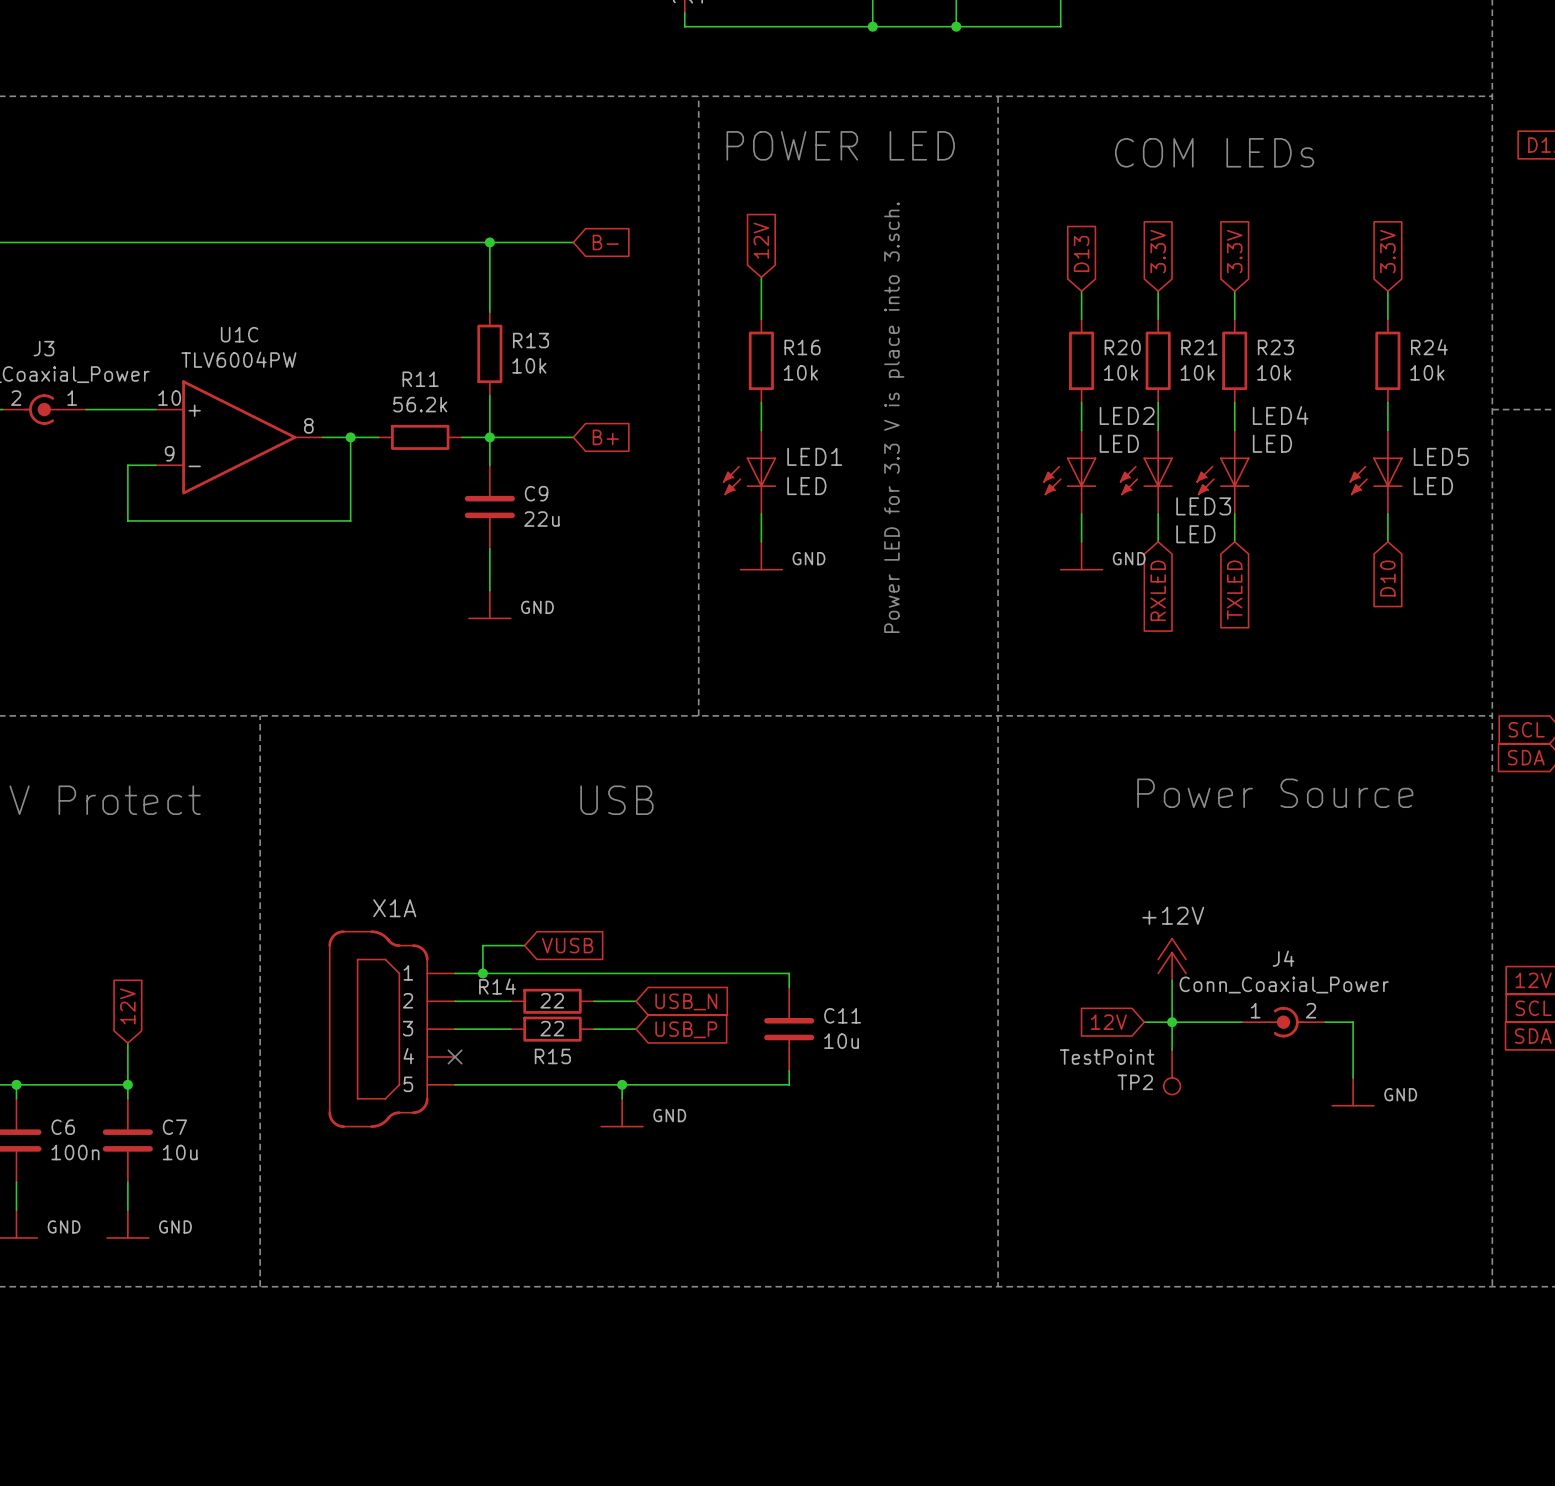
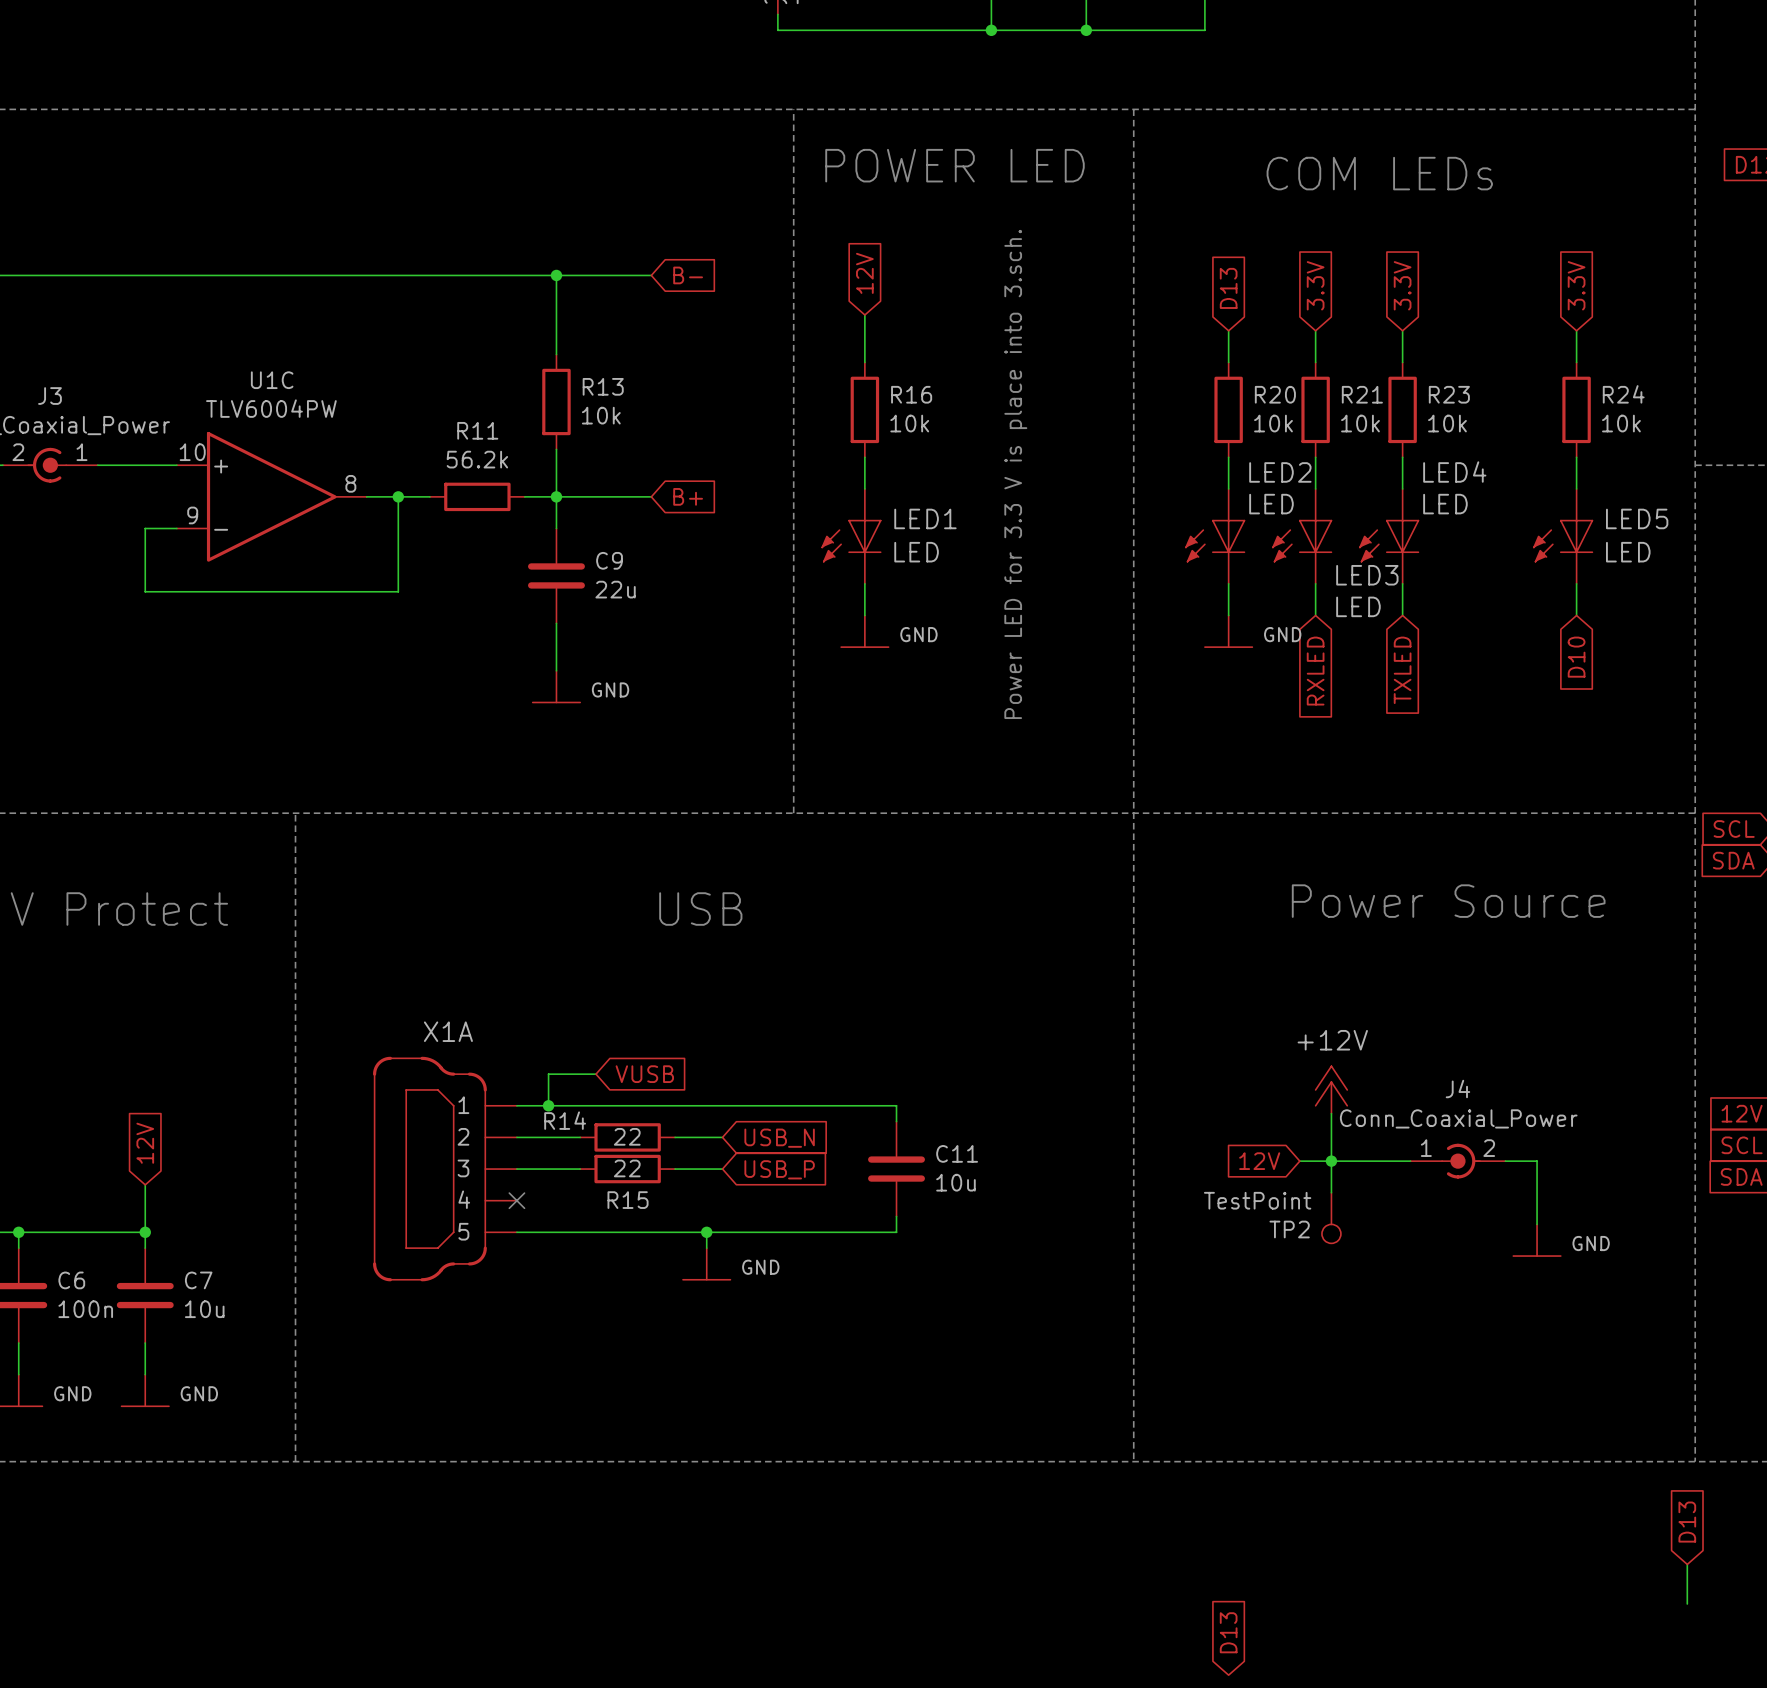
global label: none -> D13 (1687, 1522)
wire: none -> (1687, 1564) (1687, 1603)
global label: none -> D13 (1228, 1632)

